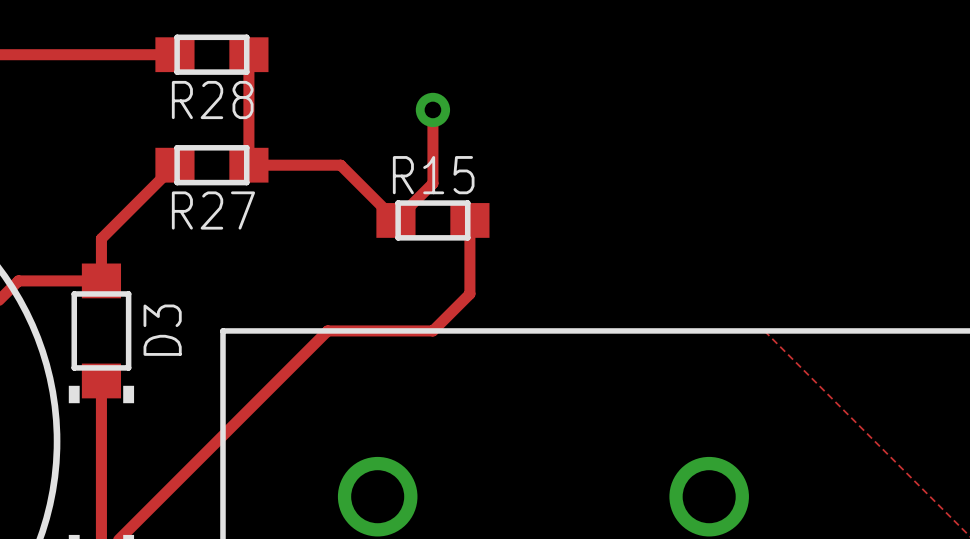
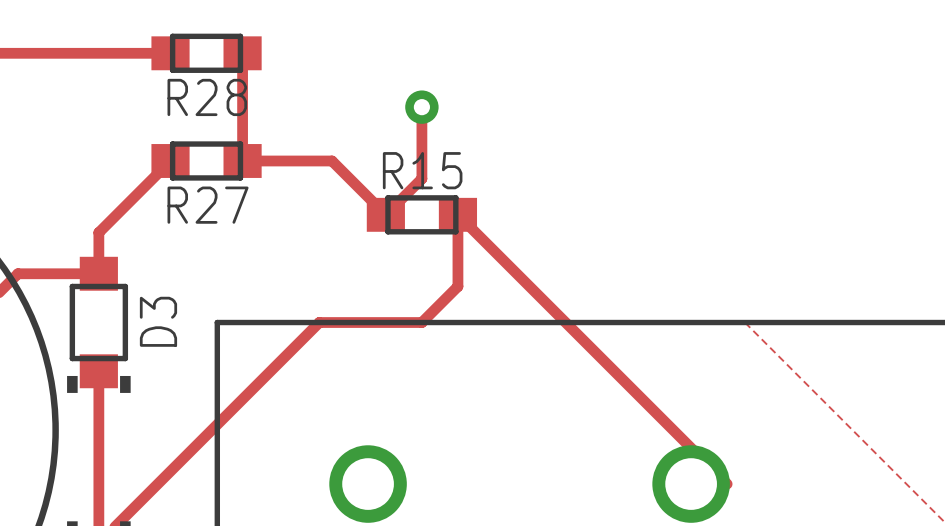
track: none -> (457, 214) (727, 484)

